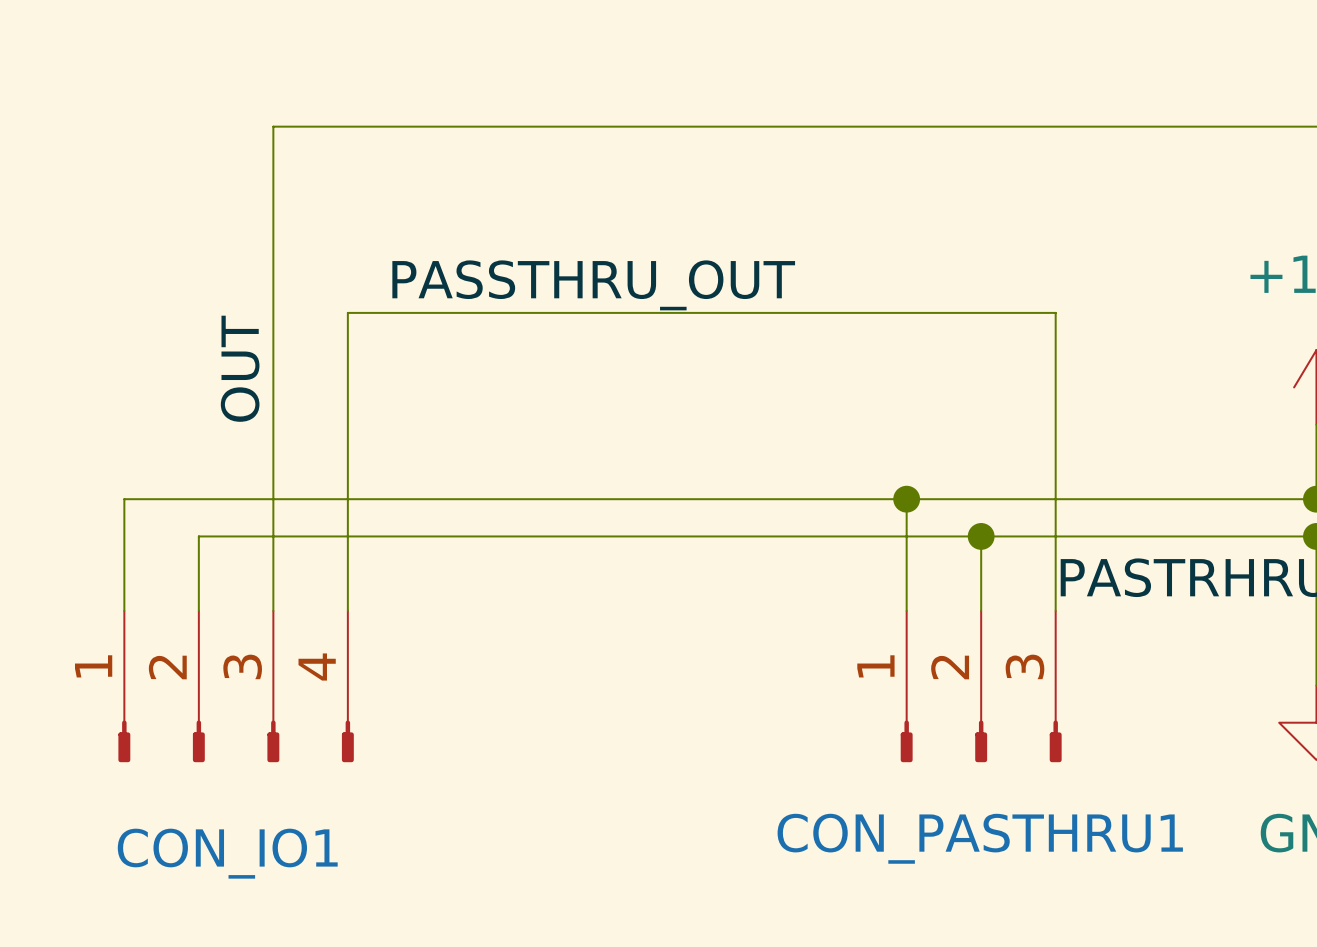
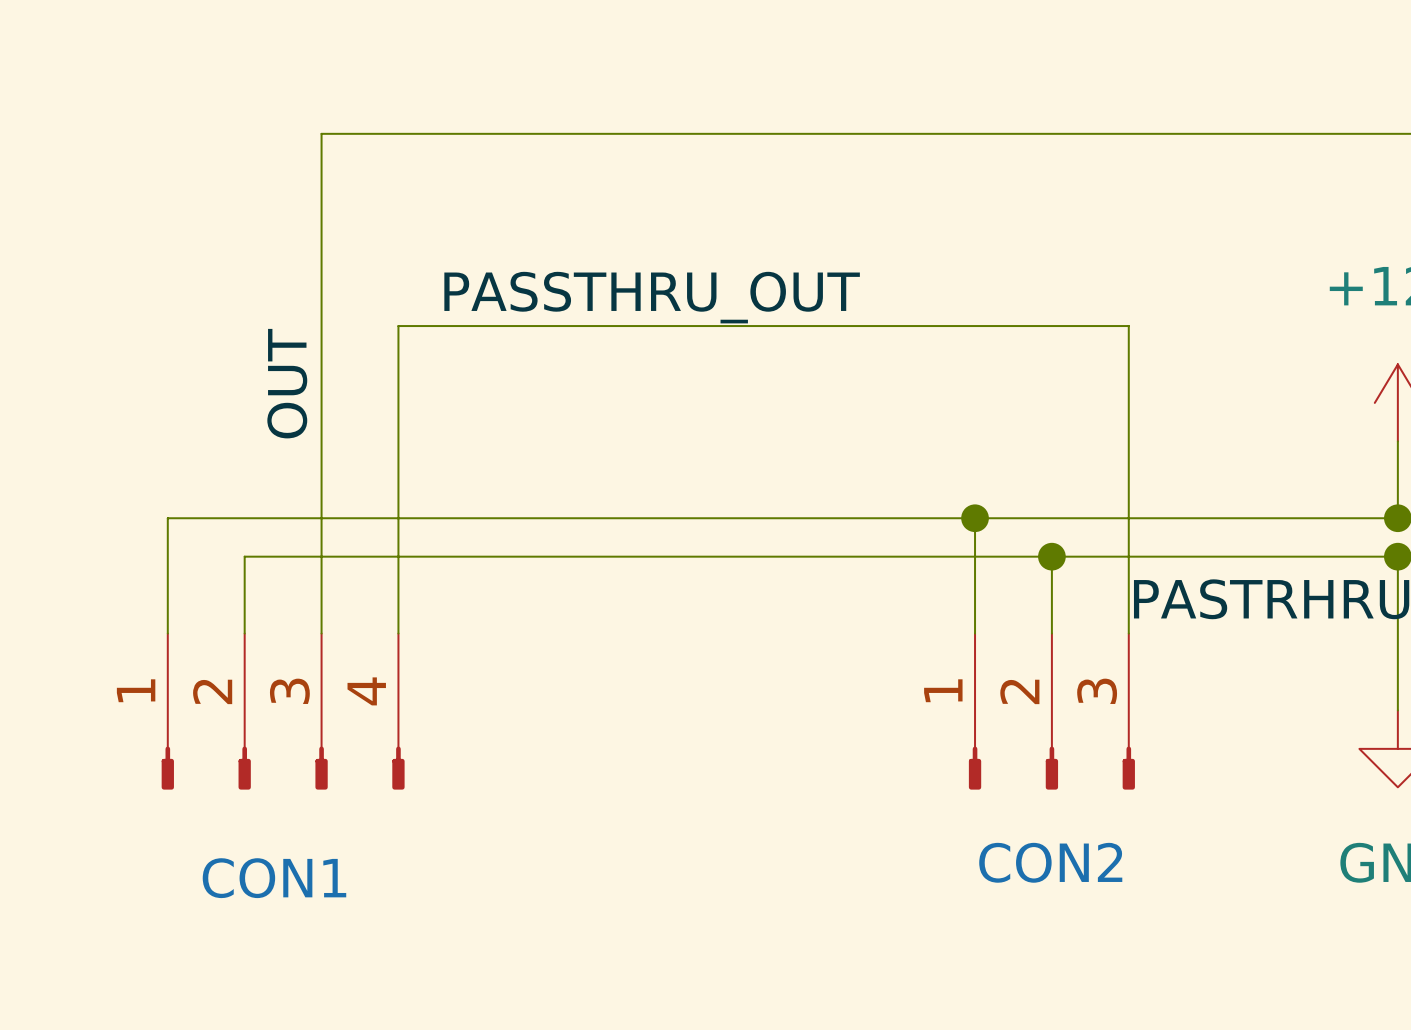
CON_PASTHRU1 name: CON_PASTHRU1 (980, 838) -> CON2 (1050, 862)
CON_IO1 name: CON_IO1 (227, 853) -> CON1 (274, 878)

